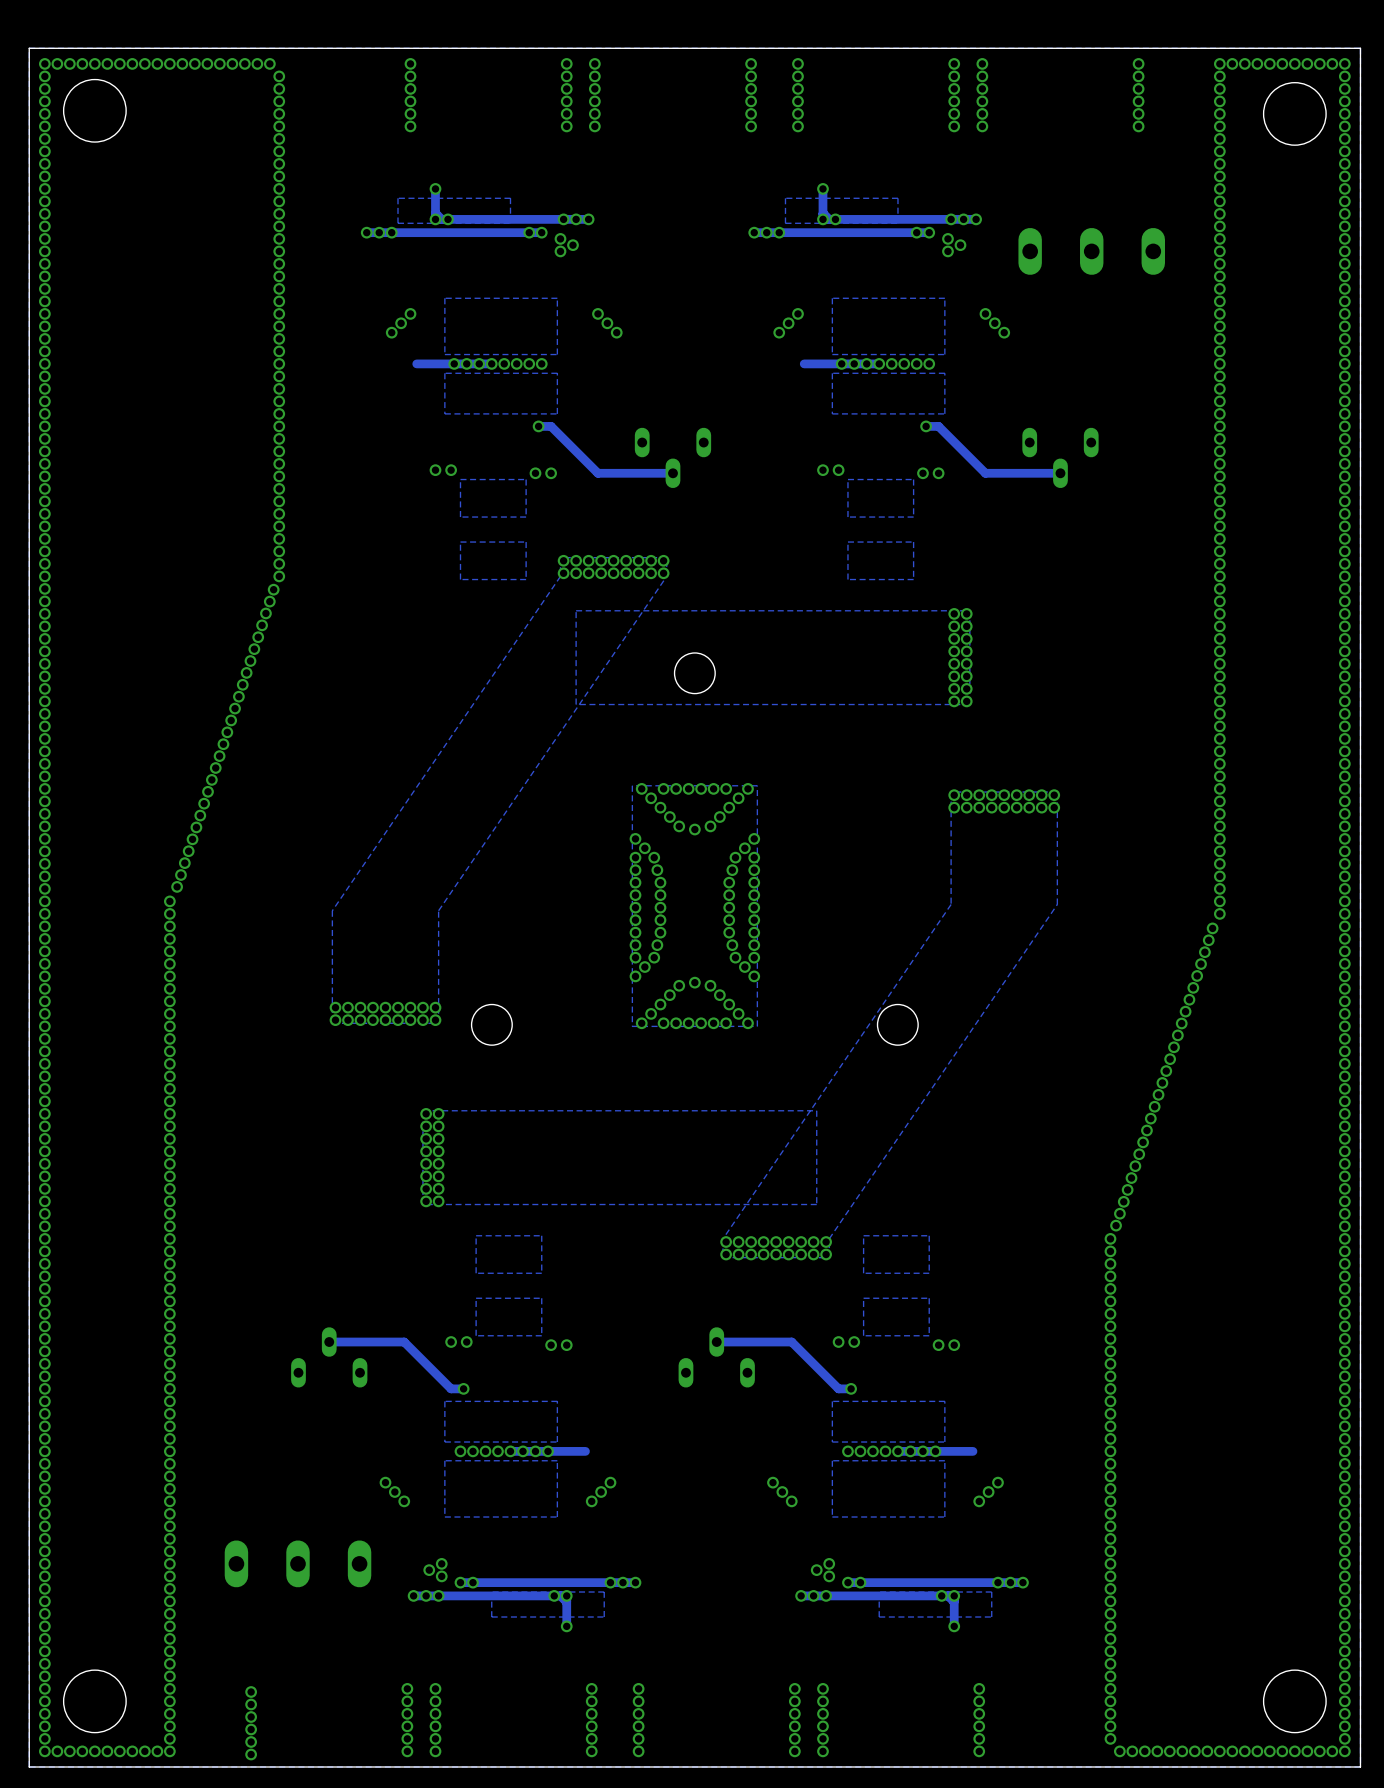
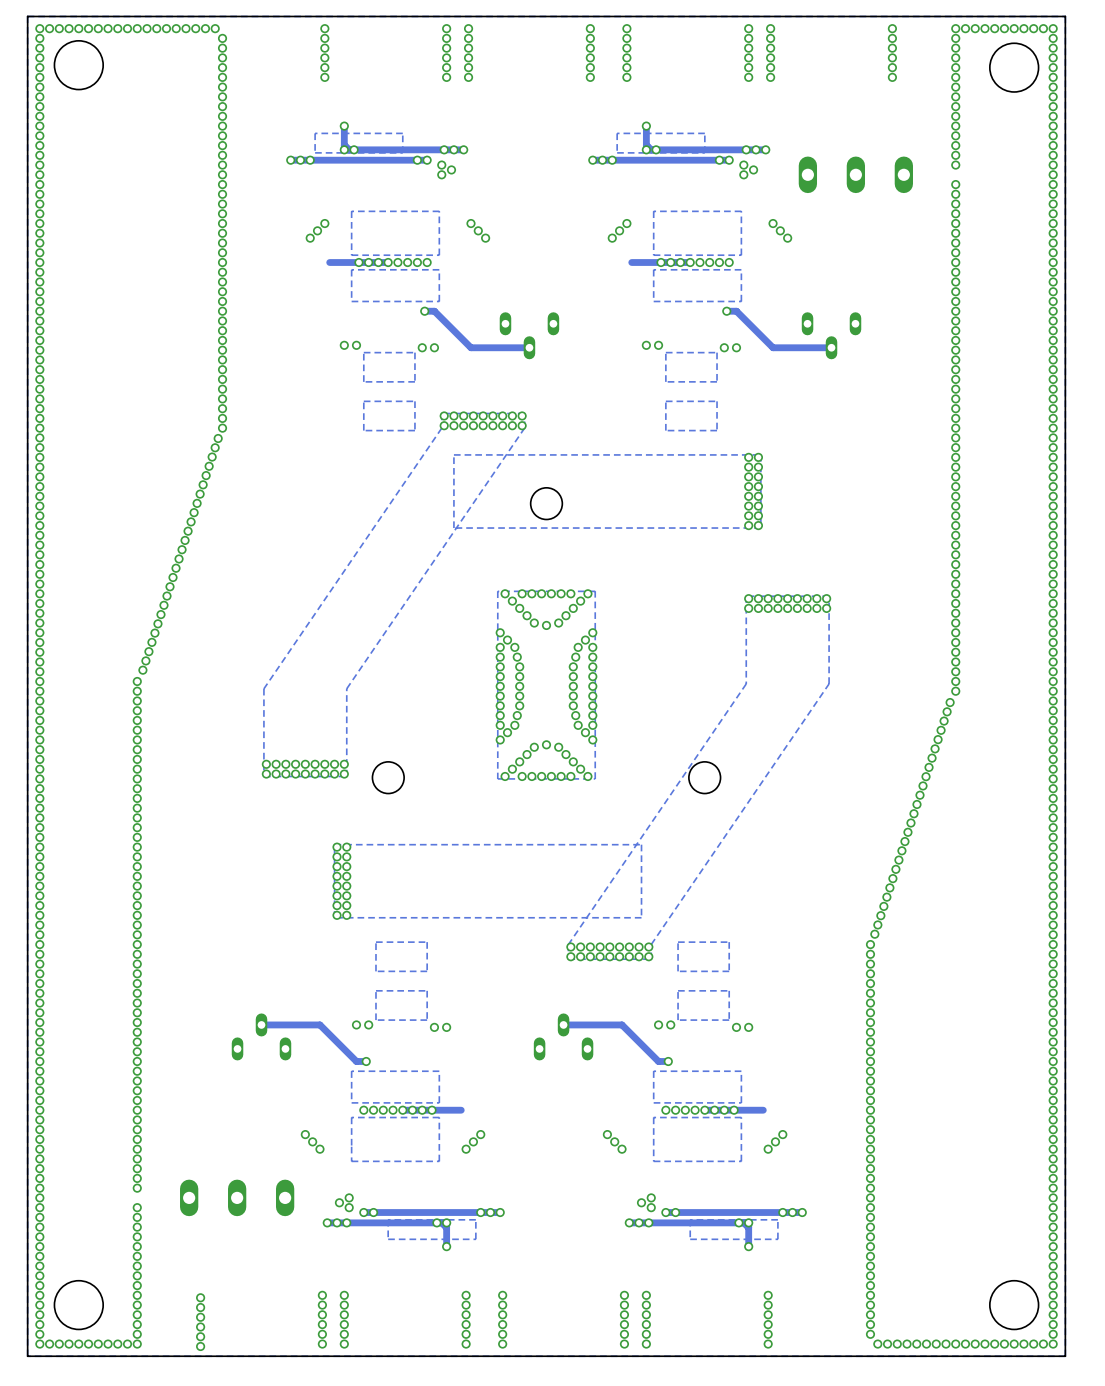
via: (1219, 251) -> none
via: (169, 1563) -> none

